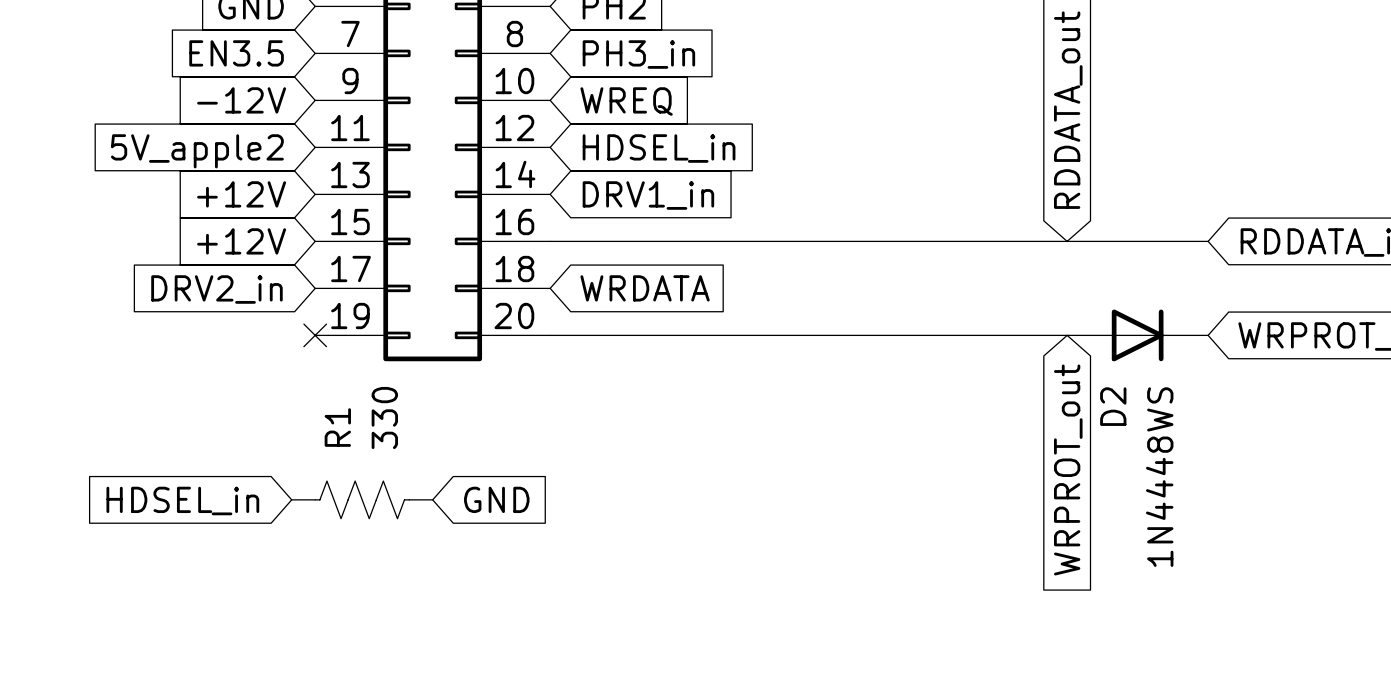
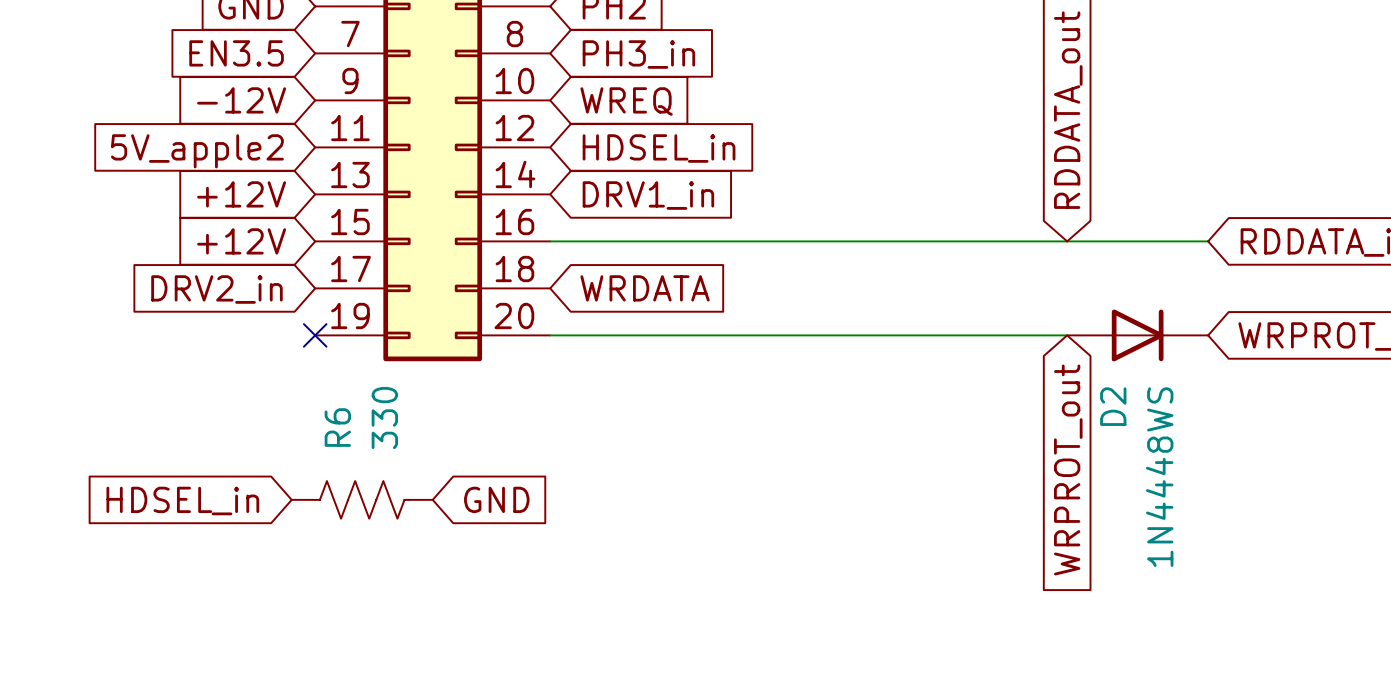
R1 name: R1 (337, 427) -> R6 (337, 427)

